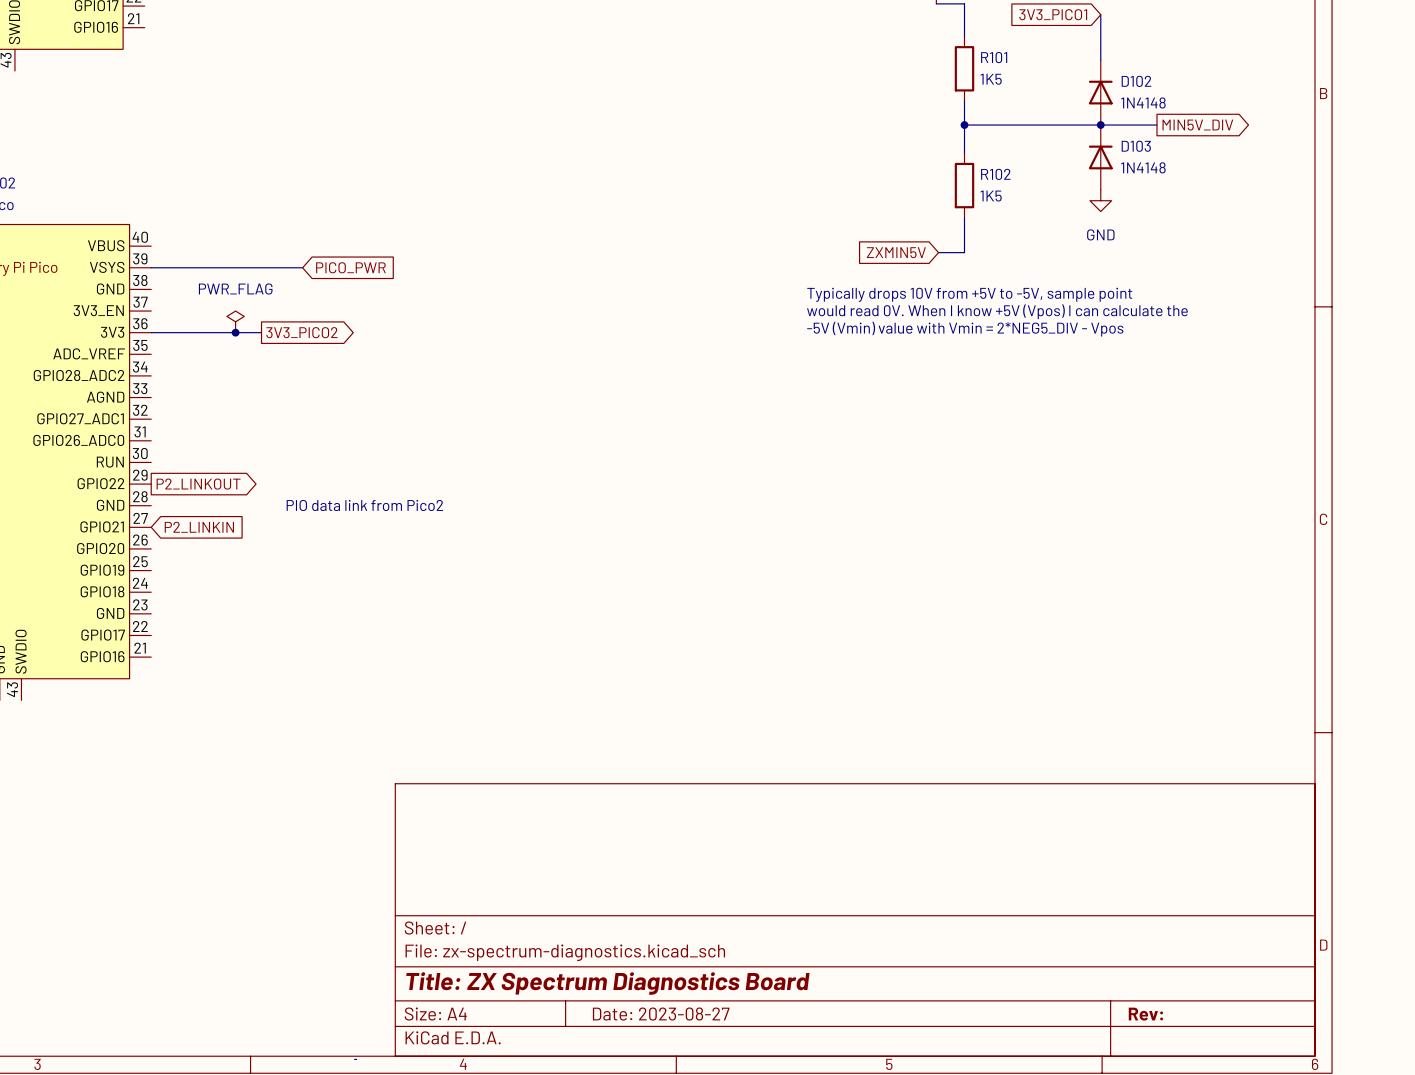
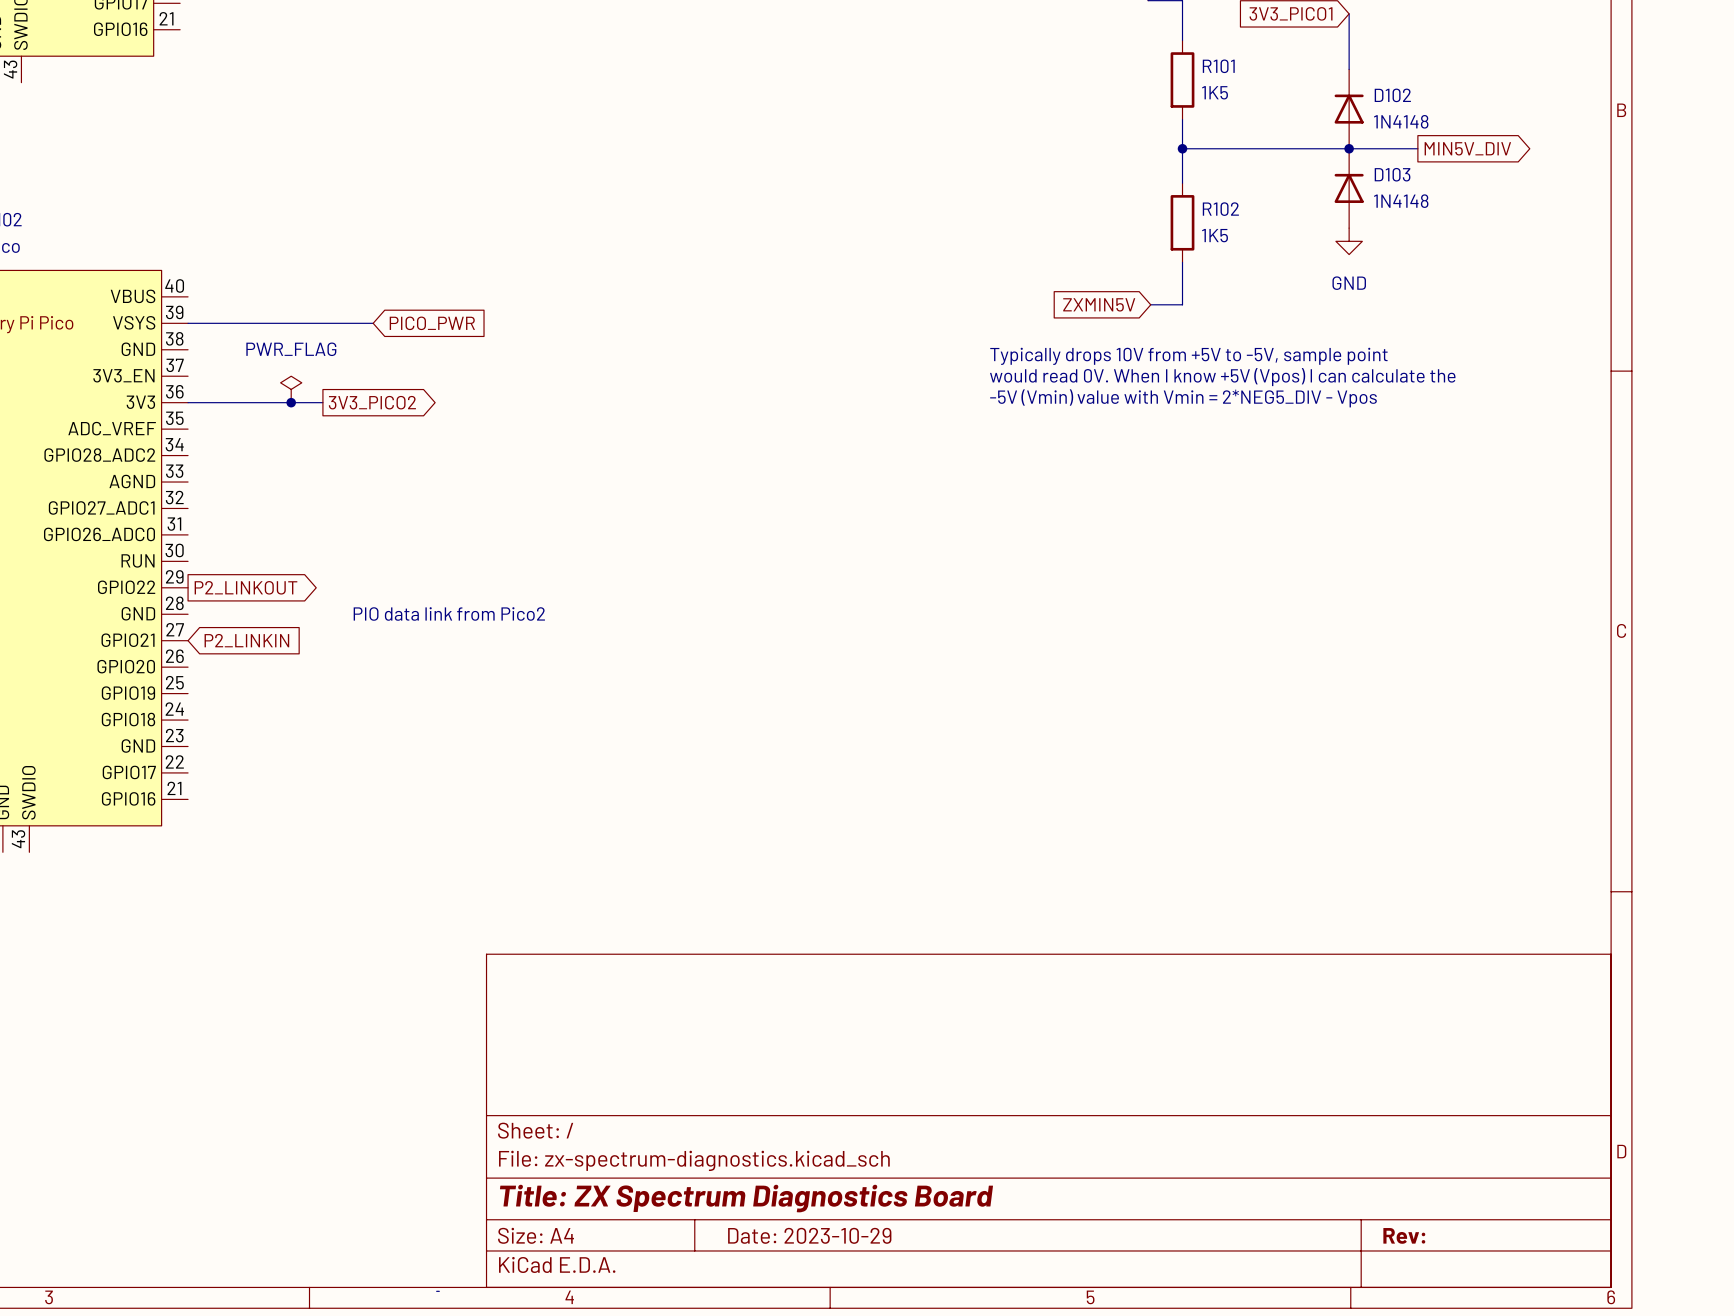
title block: Date: 2023-08-27 (661, 1014) -> Date: 2023-10-29 (809, 1235)

